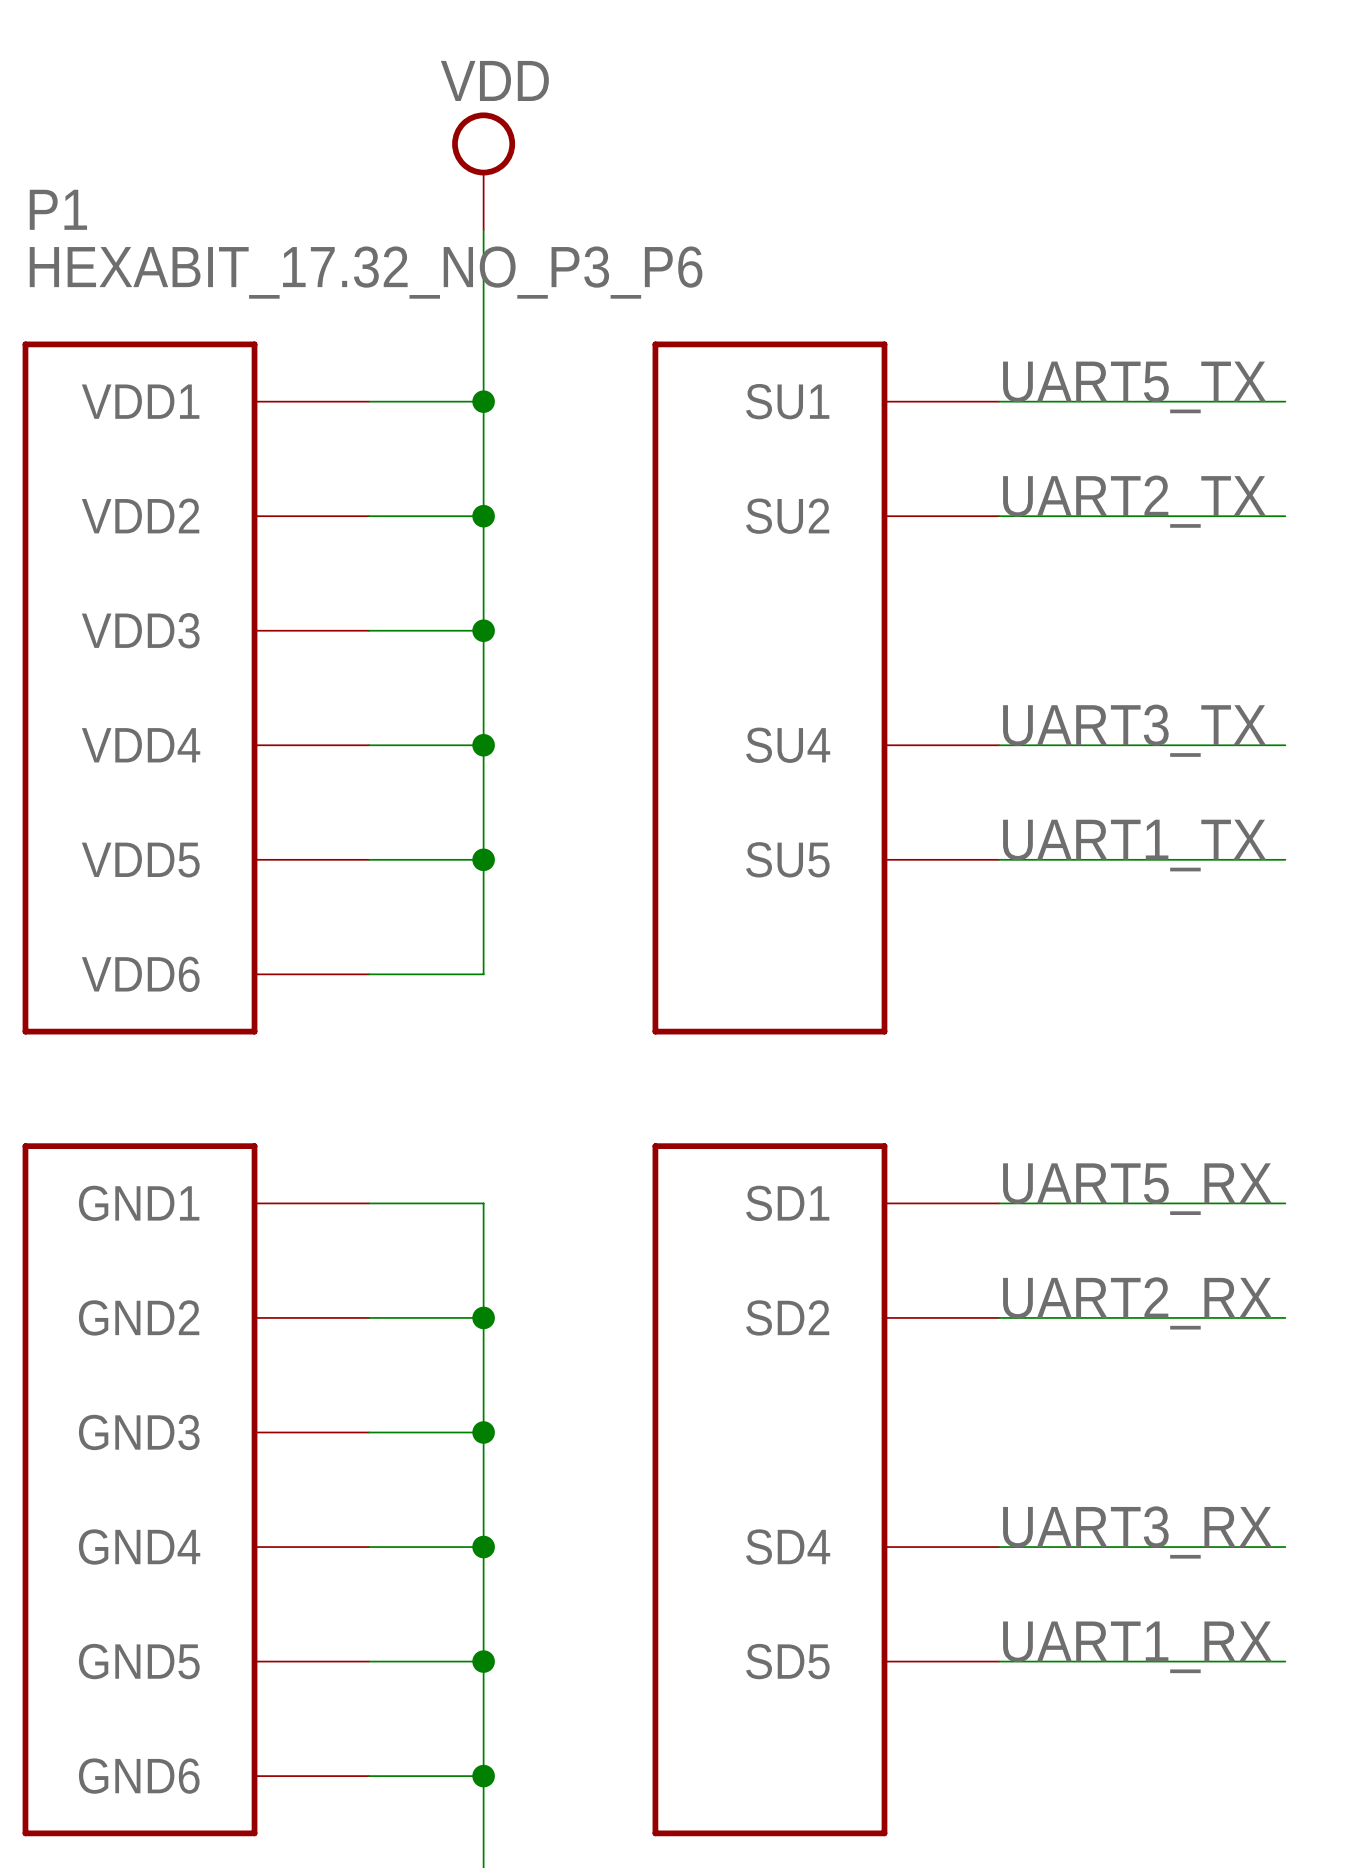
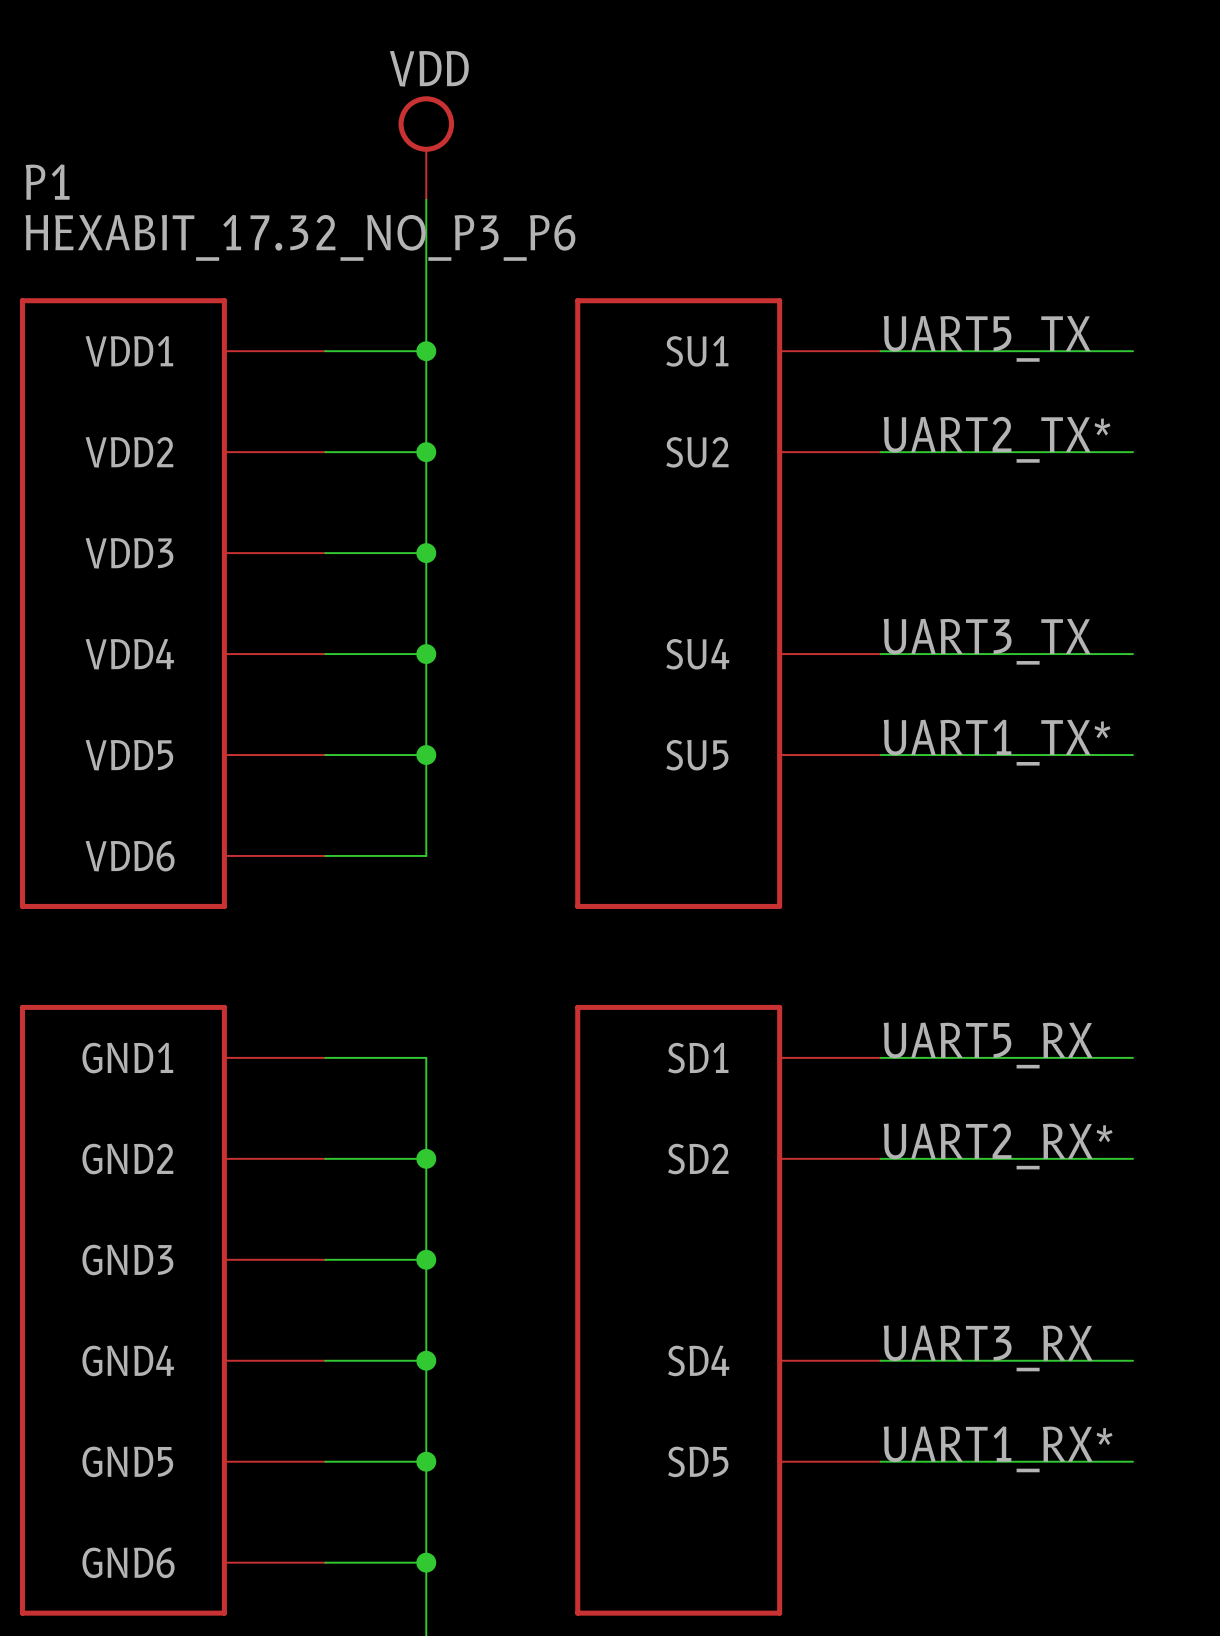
label: UART2_TX (1134, 501) -> UART2_TX* (997, 439)
label: UART1_TX (1134, 845) -> UART1_TX* (997, 742)
label: UART2_RX (1137, 1303) -> UART2_RX* (998, 1146)
label: UART1_RX (1137, 1647) -> UART1_RX* (998, 1449)

